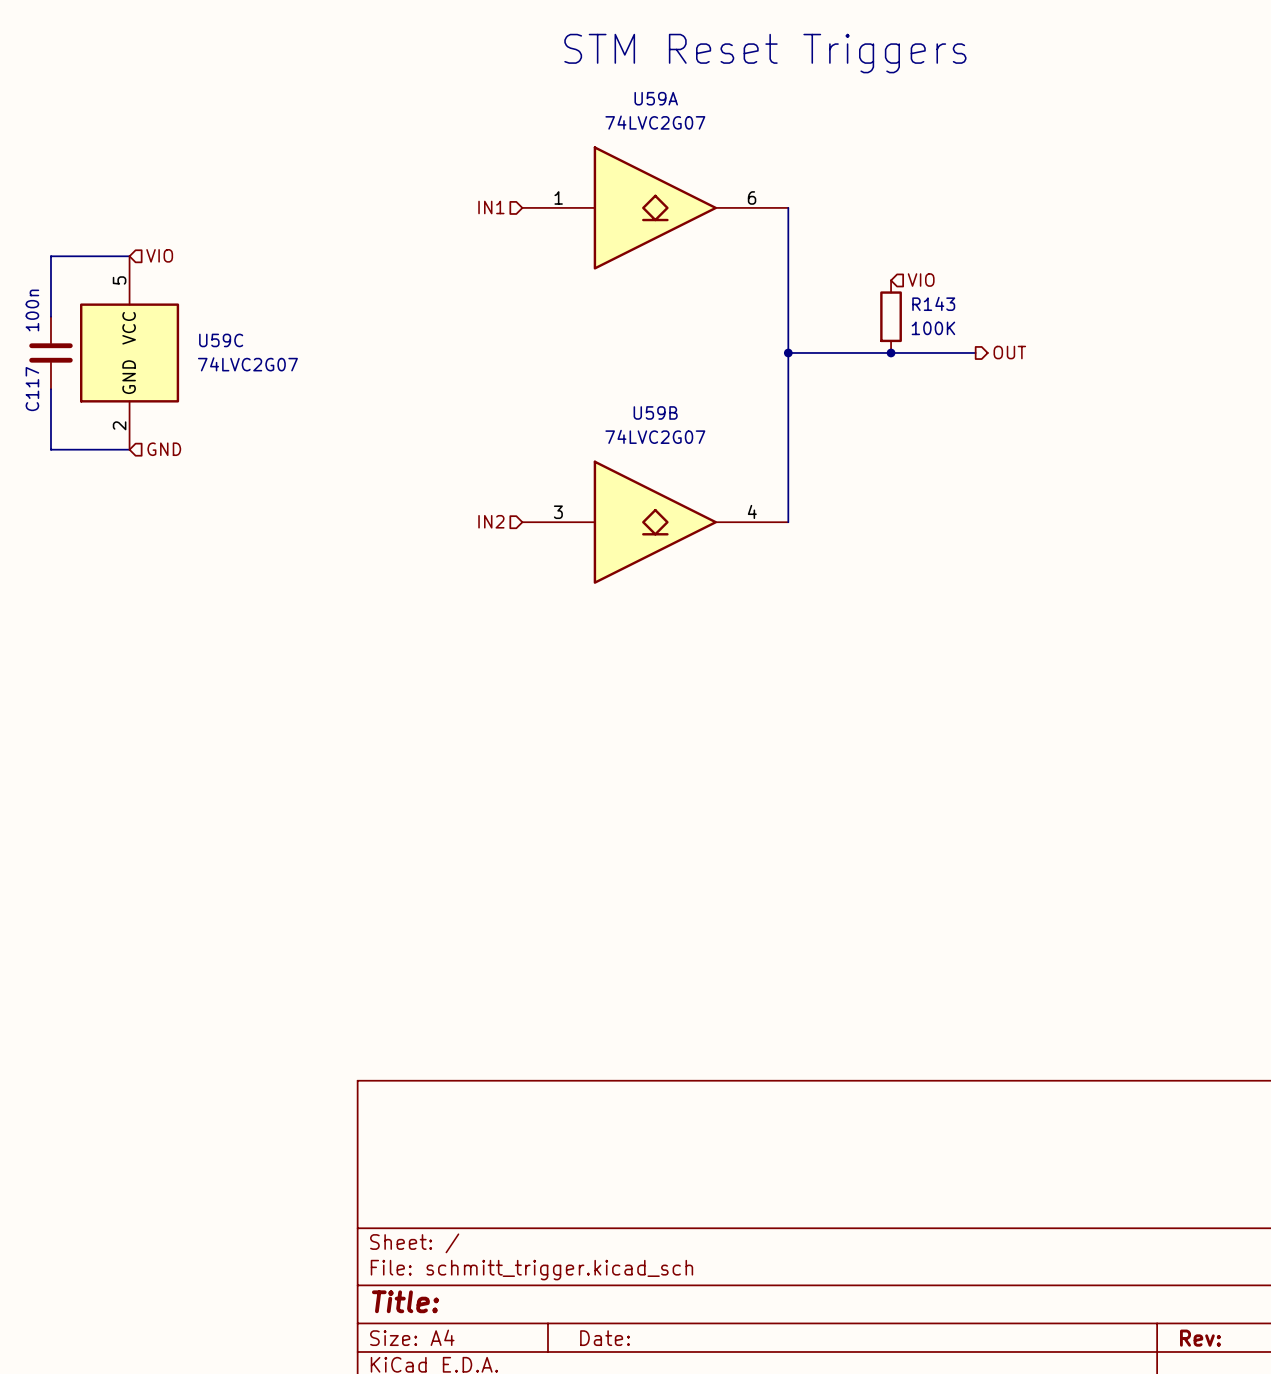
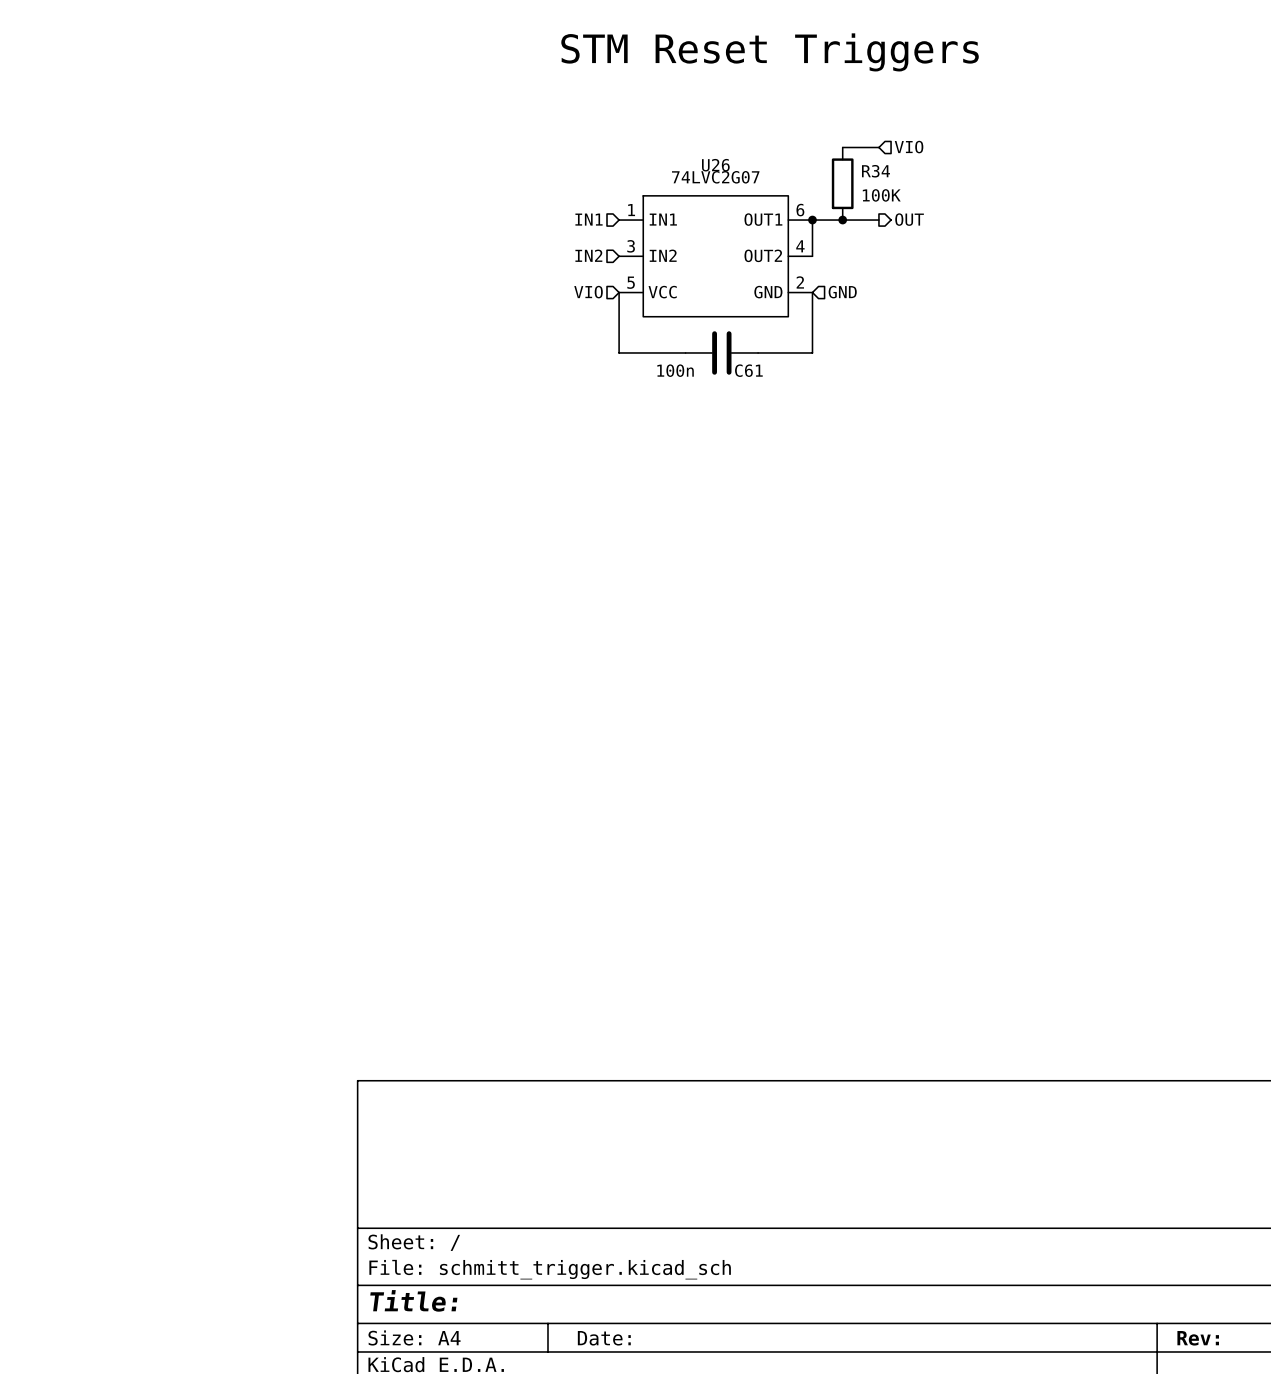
wire: none -> (842, 147) (878, 147)
R34: none -> 100K (842, 183)
hierarchical label position: IN1 (491, 207) -> IN1 (589, 219)
U59A: 74LVC2G07 (655, 207) -> none
wire: (788, 207) (788, 522) -> none
junction: none -> (812, 220)
junction: none -> (842, 220)
wire: none -> (878, 220) (812, 220) (812, 256)
hierarchical label: VIO (159, 255) -> none
hierarchical label: none -> IN2 (588, 255)
wire: (129, 256) (50, 256) (50, 316) -> none
U26: none -> 74LVC2G07 (715, 256)
hierarchical label position: VIO (921, 280) -> VIO (909, 147)
hierarchical label: none -> VIO (588, 292)
wire: none -> (619, 292) (619, 352) (685, 352)
hierarchical label: none -> GND (842, 292)
R143: 100K (891, 316) -> none
C117: 100n (50, 352) -> none
U59C: 74LVC2G07 (129, 352) -> none
C61: none -> 100n (721, 352)
wire: none -> (758, 352) (788, 352)
junction: (788, 352) -> none
wire: (812, 352) (975, 352) -> (812, 352) (812, 292)
junction: (891, 352) -> none
hierarchical label position: OUT (1009, 352) -> OUT (909, 219)
wire: (50, 389) (50, 449) (129, 449) -> none
hierarchical label: GND (164, 449) -> none
hierarchical label: IN2 (491, 521) -> none
U59B: 74LVC2G07 (655, 522) -> none

